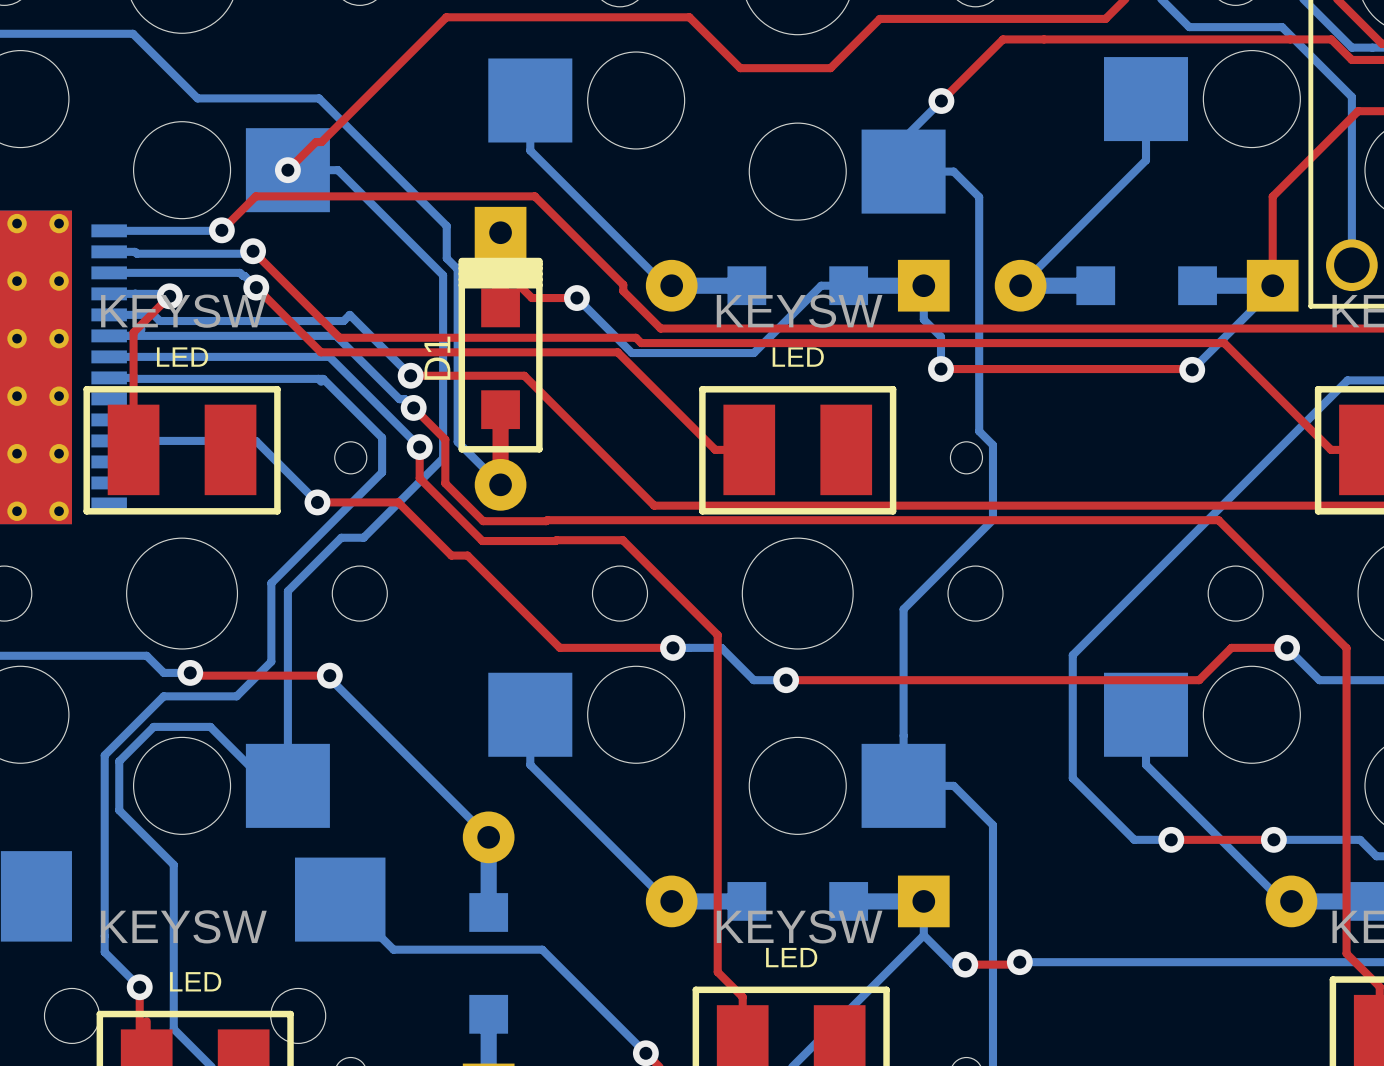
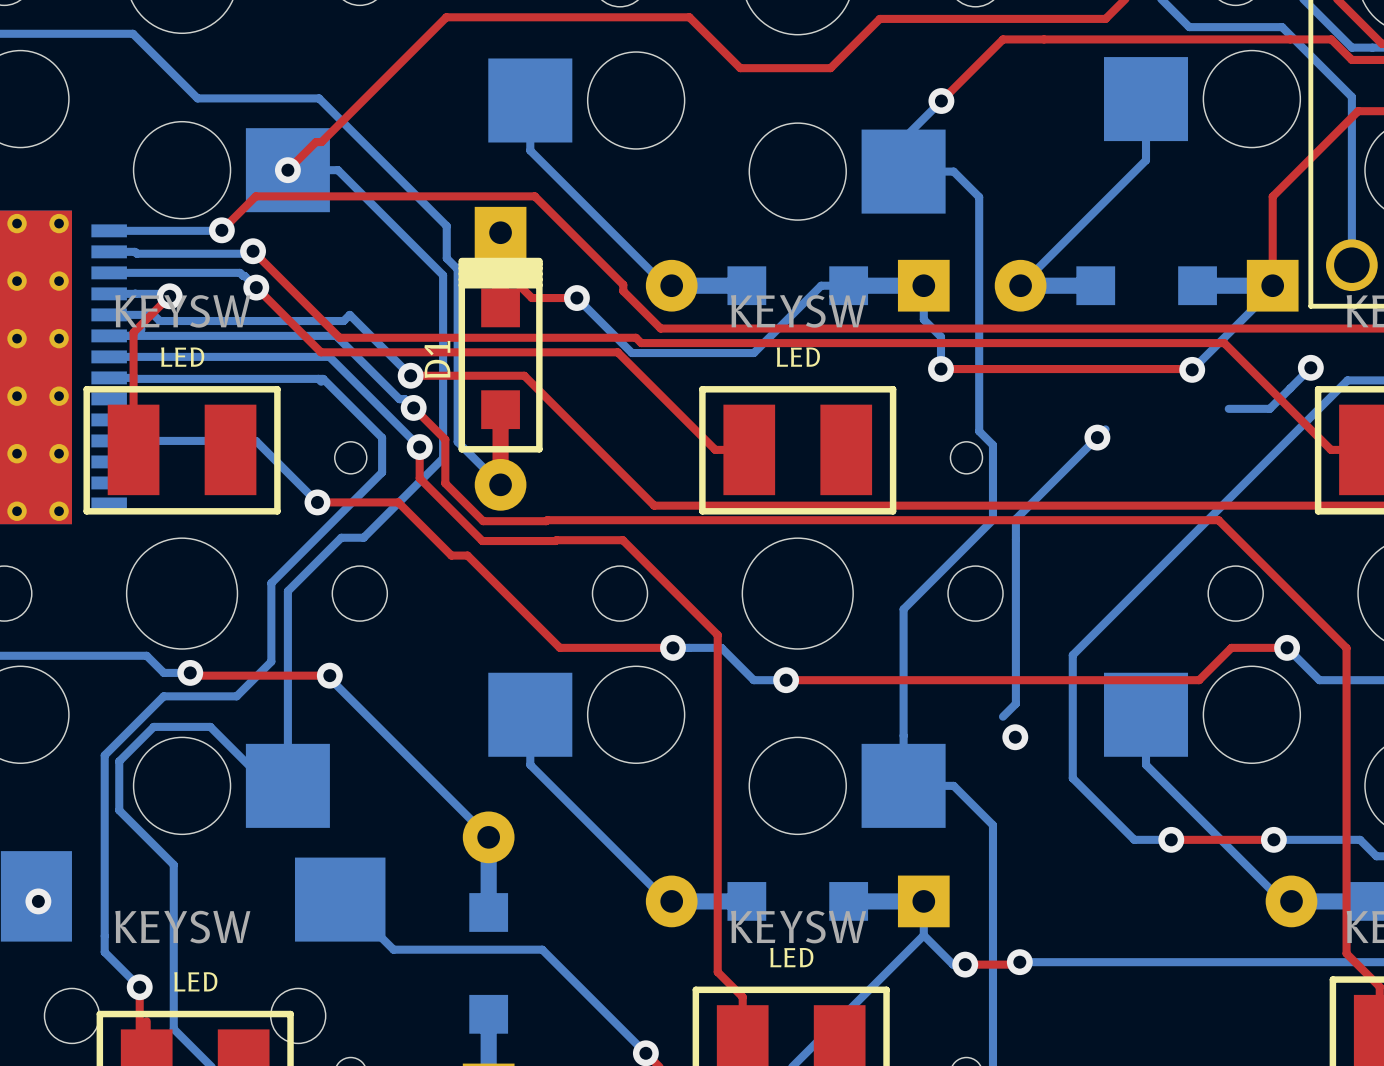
bottom track: none -> (1310, 367) (1269, 408) (1228, 408)
via: none -> (1310, 367)
bottom track: none -> (1105, 429) (1015, 519) (1015, 703) (1002, 716)
via: none -> (1097, 437)
via: none -> (1015, 737)
via: none -> (38, 901)

